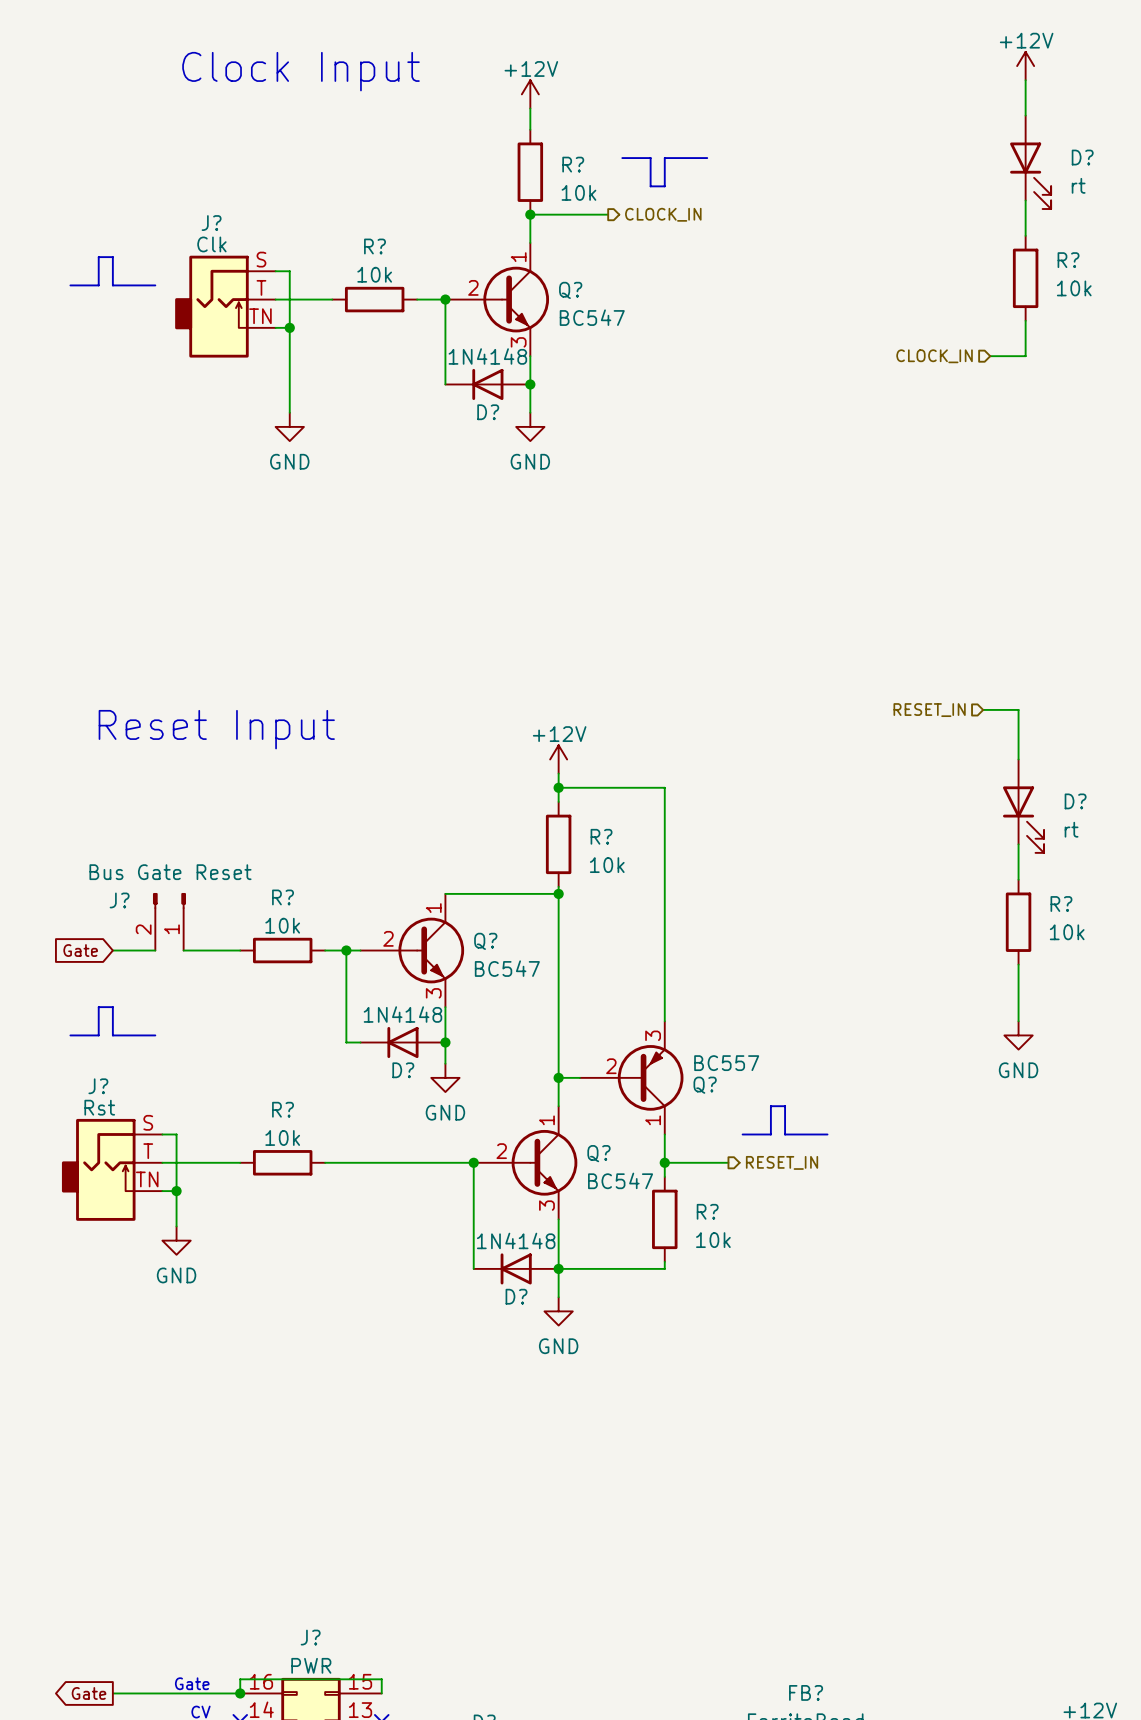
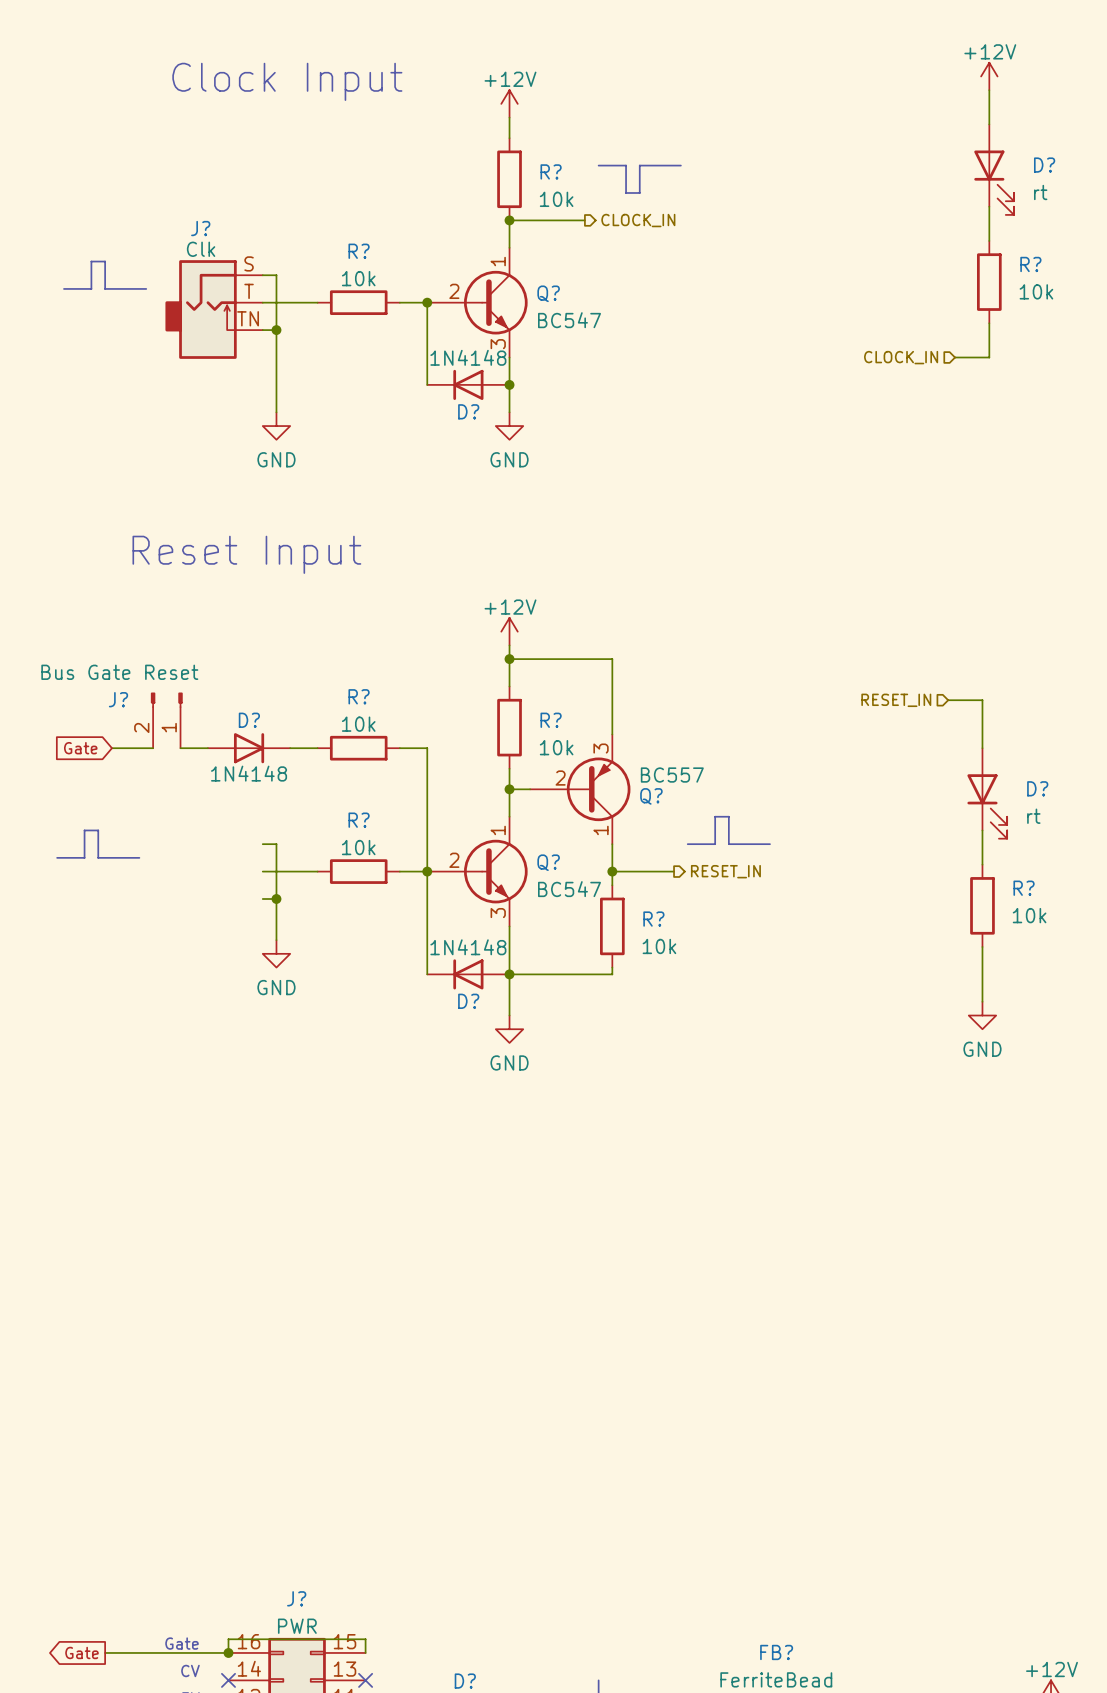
wire: none -> (509, 645) (509, 686)
wire: none -> (509, 659) (612, 659) (612, 734)
junction: none -> (509, 659)
text position: Reset Input (216, 729) -> Reset Input (246, 554)
R?: none -> 10k (509, 727)
wire: none -> (180, 748) (207, 748)
D?: none -> 1N4148 (249, 748)
wire: none -> (290, 748) (317, 748)
R?: none -> 10k (358, 748)
wire: none -> (399, 748) (427, 748) (427, 974)
power symbol position: +12V (558, 759) -> +12V (509, 631)
wire: (558, 773) (558, 801) -> none
wire: none -> (509, 768) (509, 816)
wire: (558, 787) (664, 787) (664, 1021) -> none
junction position: (558, 787) -> (509, 789)
R?: 10k (558, 844) -> none
wire: none -> (262, 844) (276, 844) (276, 940)
J? value position: Bus Gate Reset (170, 872) -> Bus Gate Reset (119, 672)
R?: none -> 10k (358, 871)
wire: none -> (399, 871) (427, 871)
junction: none -> (427, 871)
wire: (558, 886) (558, 1106) -> none
junction: none -> (612, 871)
wire: (445, 893) (558, 893) -> none
junction: (558, 893) -> none
wire: none -> (262, 899) (276, 899)
junction: none -> (276, 899)
J? position: (169, 921) -> (166, 720)
wire: none -> (509, 926) (509, 1015)
R?: none -> 10k (612, 926)
global label position: Gate (80, 950) -> Gate (80, 748)
wire: (112, 950) (155, 950) -> (111, 748) (153, 748)
wire: (183, 950) (240, 950) -> (262, 871) (317, 871)
R?: 10k (282, 950) -> none
wire: (325, 950) (360, 950) -> none
wire: (346, 950) (346, 1042) (360, 1042) -> none
junction: (346, 950) -> none
Q? position: (412, 950) -> (477, 871)
power symbol: none -> GND (276, 953)
junction: none -> (509, 974)
wire: (445, 1007) (445, 1063) -> none
line: (70, 1035) (98, 1035) (98, 1007) (112, 1007) (112, 1035) (155, 1035) -> (57, 857) (84, 857) (84, 830) (98, 830) (98, 857) (139, 857)
D? position: (402, 1042) -> (468, 974)
junction: (445, 1042) -> none
power symbol position: GND (445, 1077) -> GND (509, 1029)
wire: (558, 1077) (579, 1077) -> (509, 789) (530, 789)
junction: (558, 1077) -> none
Q? position: (631, 1077) -> (580, 789)
wire: (162, 1134) (176, 1134) (176, 1226) -> none
wire: (664, 1134) (664, 1176) -> (612, 844) (612, 885)
line: (742, 1134) (770, 1134) (770, 1106) (785, 1106) (785, 1134) (827, 1134) -> (687, 844) (715, 844) (715, 816) (728, 816) (728, 844) (769, 844)
wire: (162, 1162) (240, 1162) -> none
R?: 10k (282, 1162) -> none
wire: (325, 1162) (473, 1162) (473, 1268) -> none
junction: (473, 1162) -> none
Q?: BC547 (525, 1162) -> none
wire: (664, 1162) (728, 1162) -> (612, 871) (674, 871)
junction: (664, 1162) -> none
hierarchical label position: RESET_IN (782, 1162) -> RESET_IN (725, 871)
J?: Rst (112, 1169) -> none
wire: (162, 1191) (176, 1191) -> none
junction: (176, 1191) -> none
wire: (558, 1219) (558, 1297) -> none
R?: 10k (664, 1219) -> none
power symbol: GND (176, 1240) -> none
wire: (664, 1261) (664, 1268) (558, 1268) -> (612, 967) (612, 974) (509, 974)
D?: 1N4148 (516, 1268) -> none
junction: (558, 1268) -> none
power symbol: GND (558, 1311) -> none

